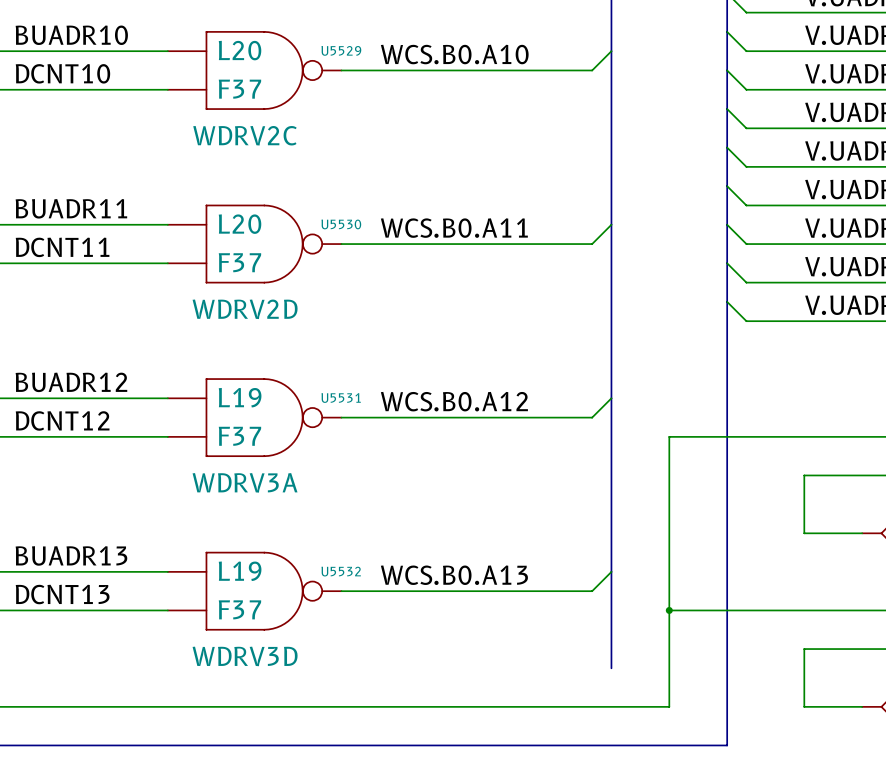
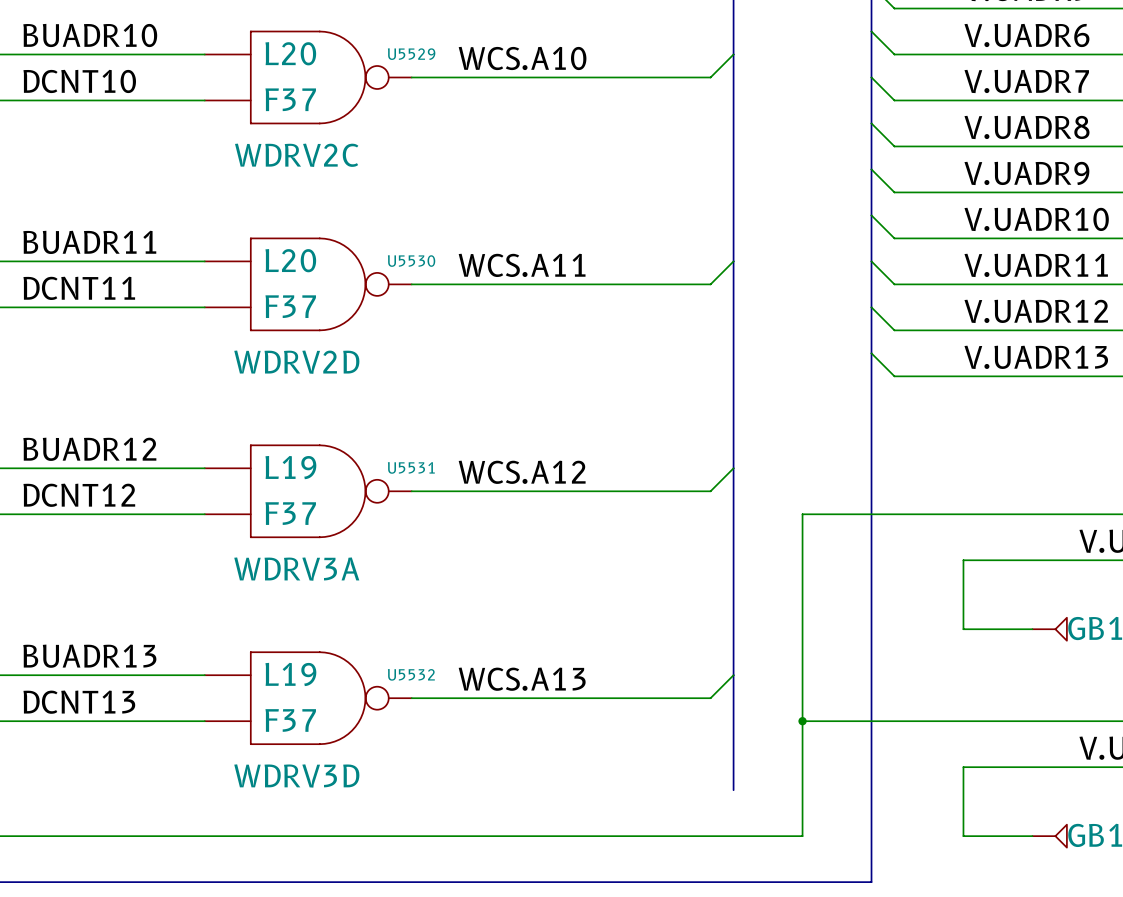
label: WCS.B0.A10 (454, 54) -> WCS.A10 (522, 58)
label: WCS.B0.A11 (454, 228) -> WCS.A11 (522, 265)
label: WCS.B0.A12 (454, 401) -> WCS.A12 (522, 472)
label: WCS.B0.A13 (454, 575) -> WCS.A13 (522, 679)

